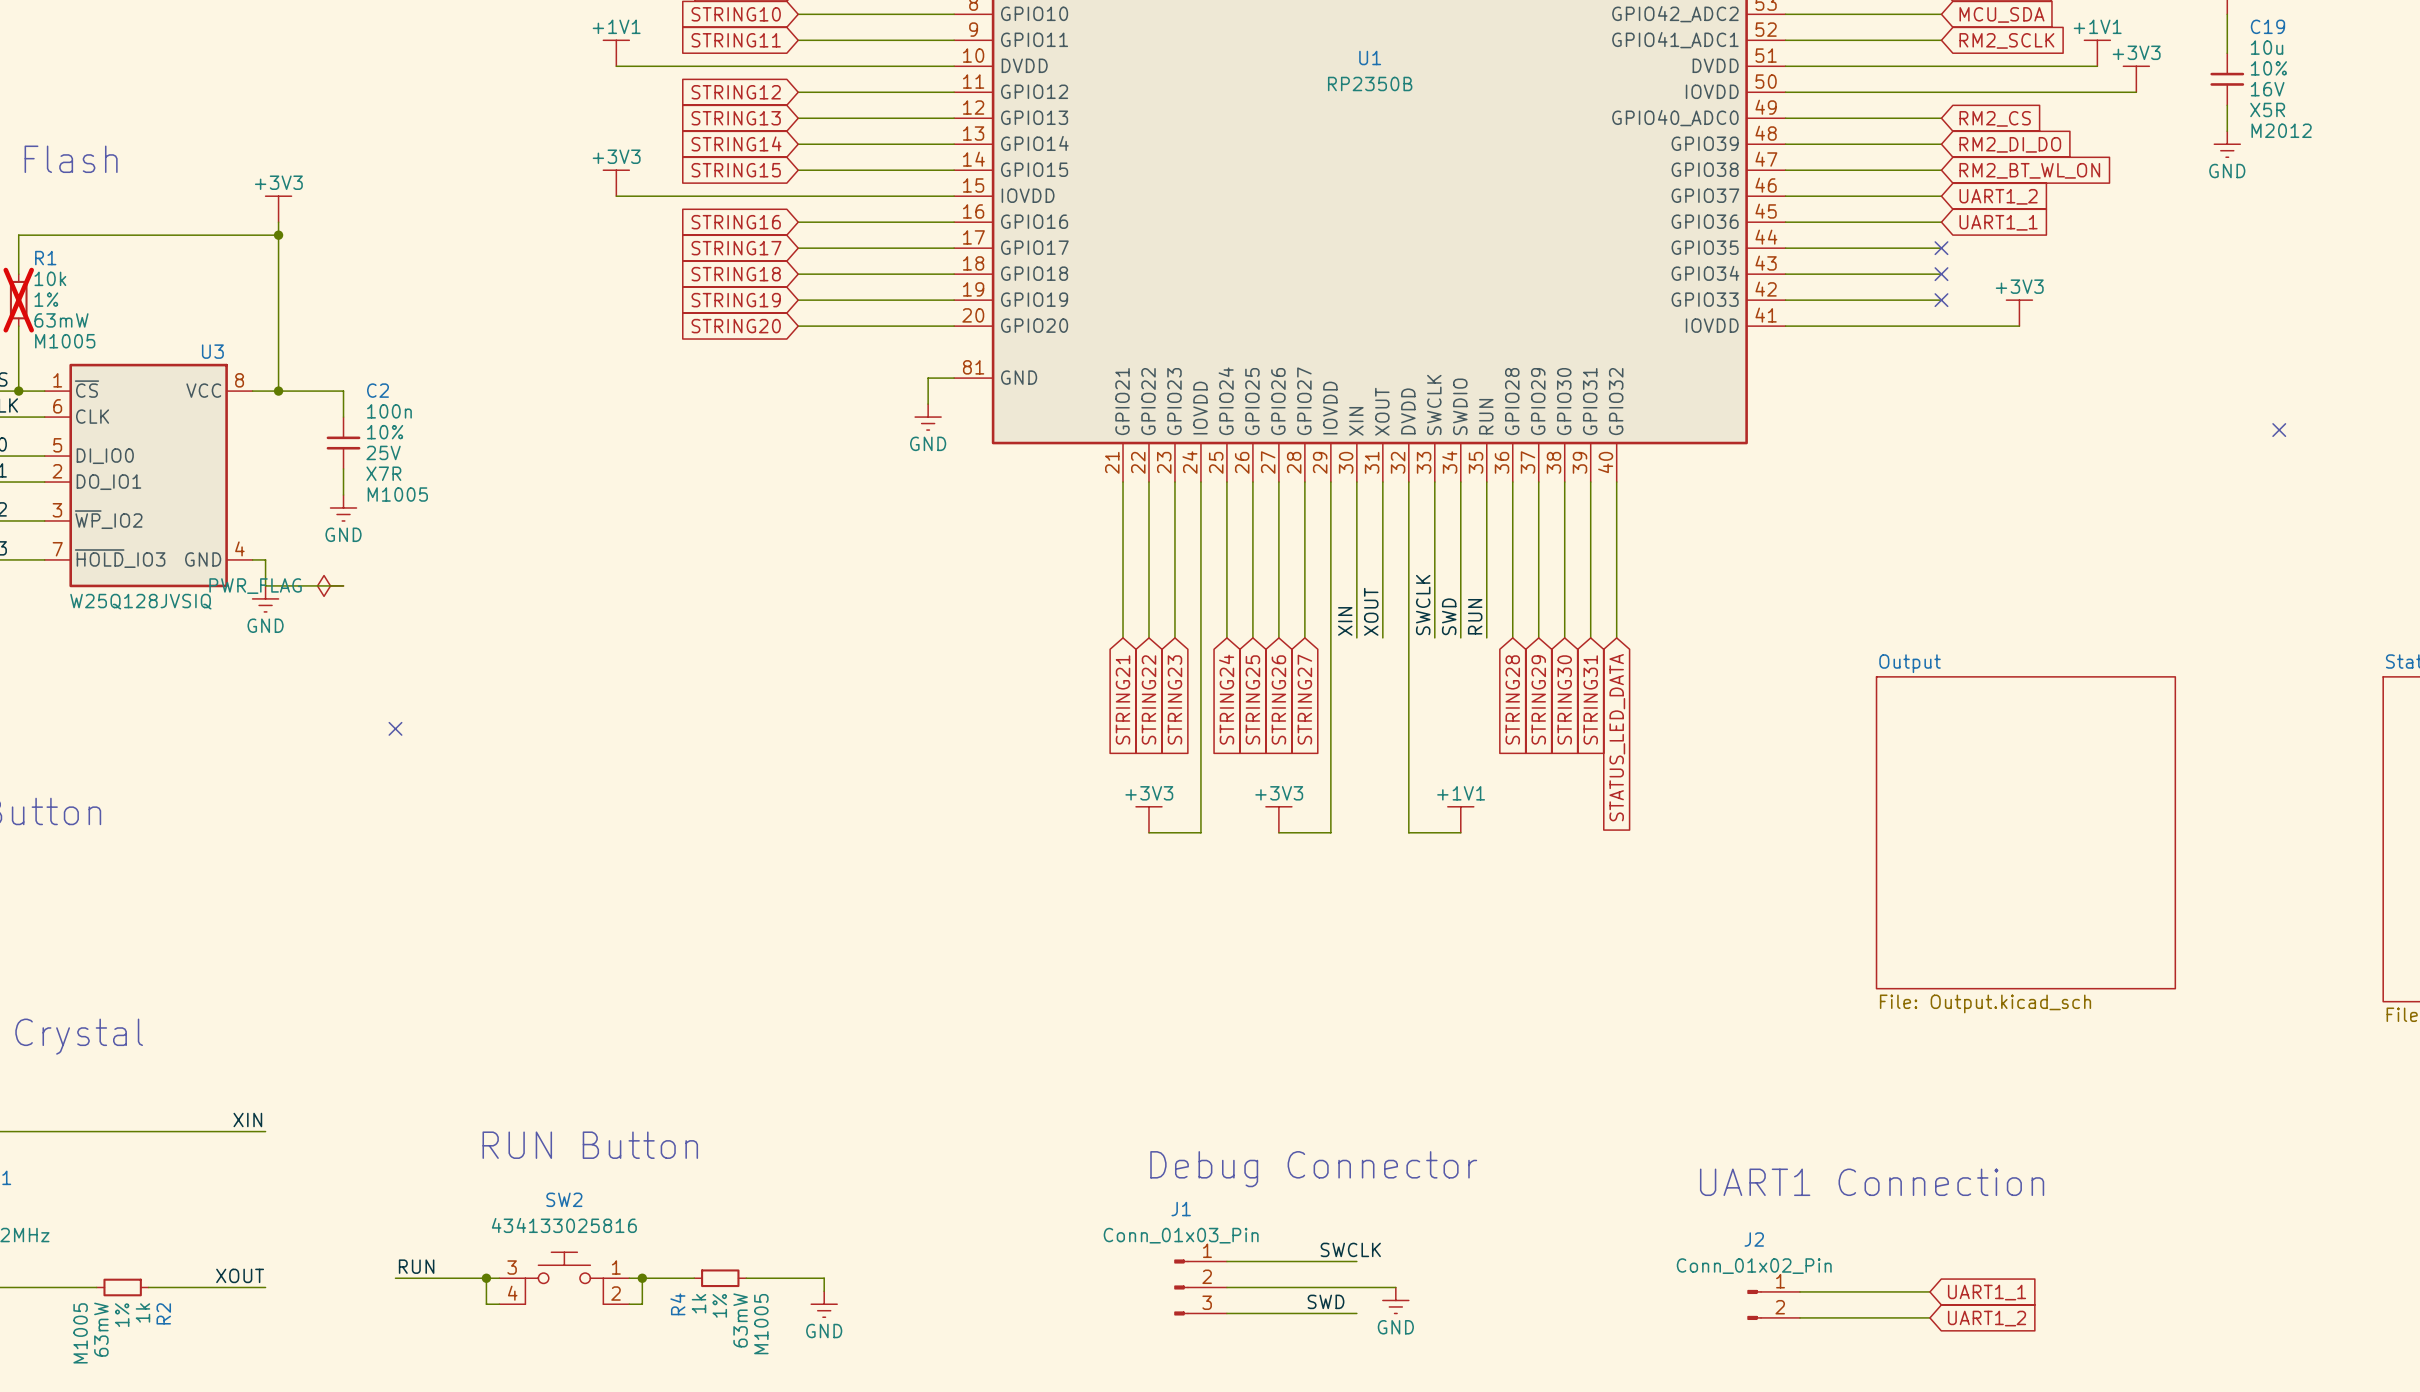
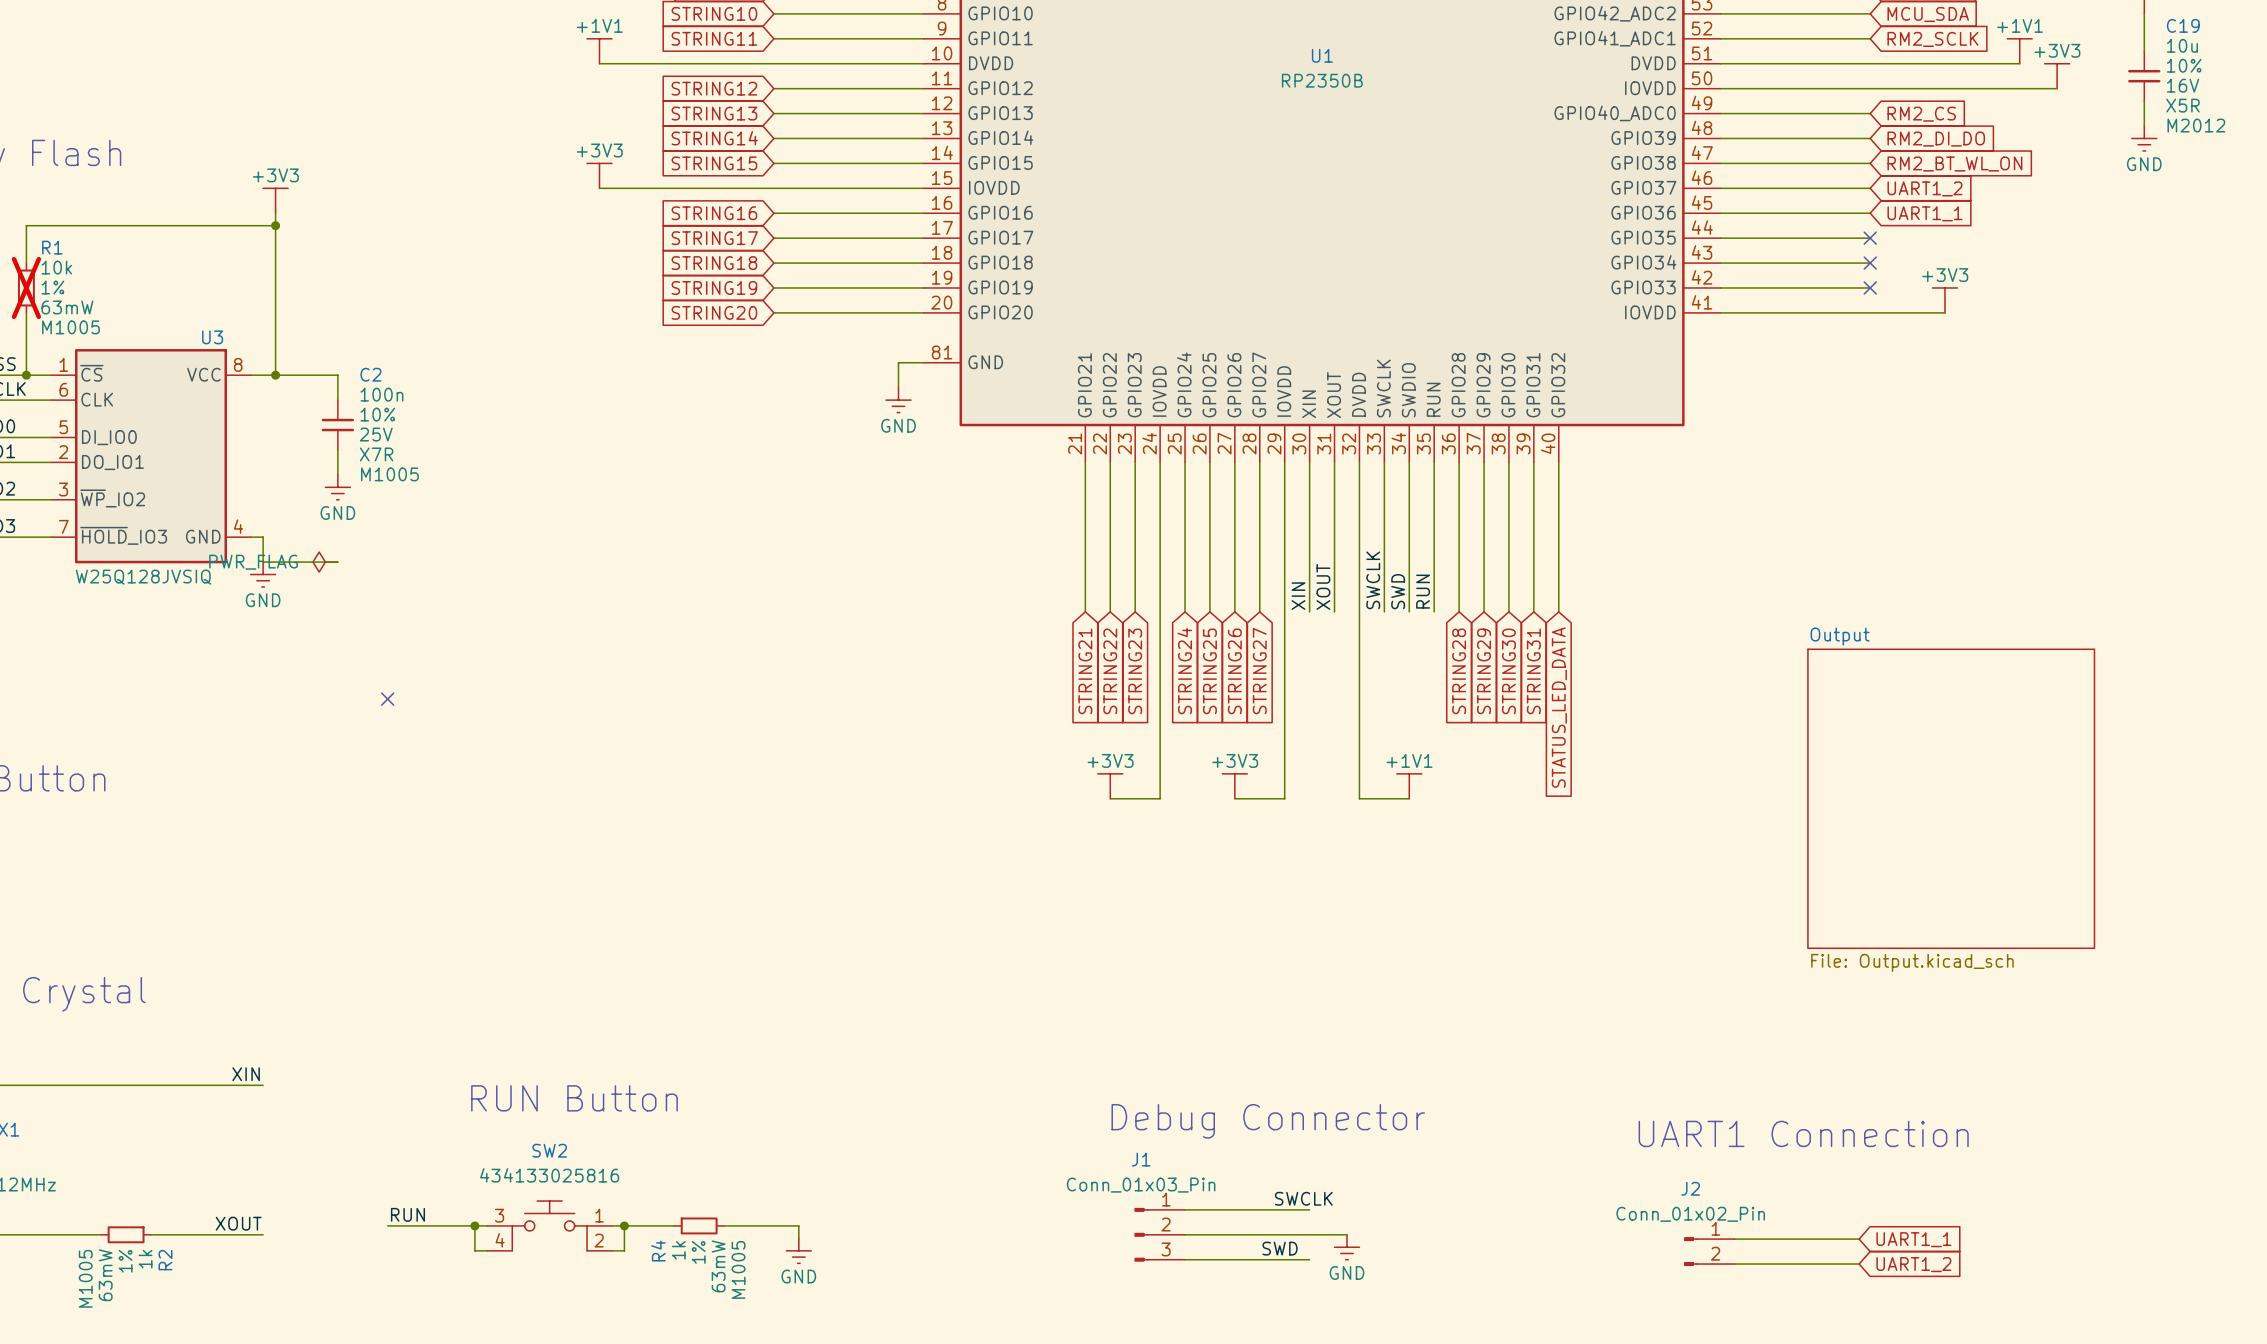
no-connect mark: (2279, 430) -> none

